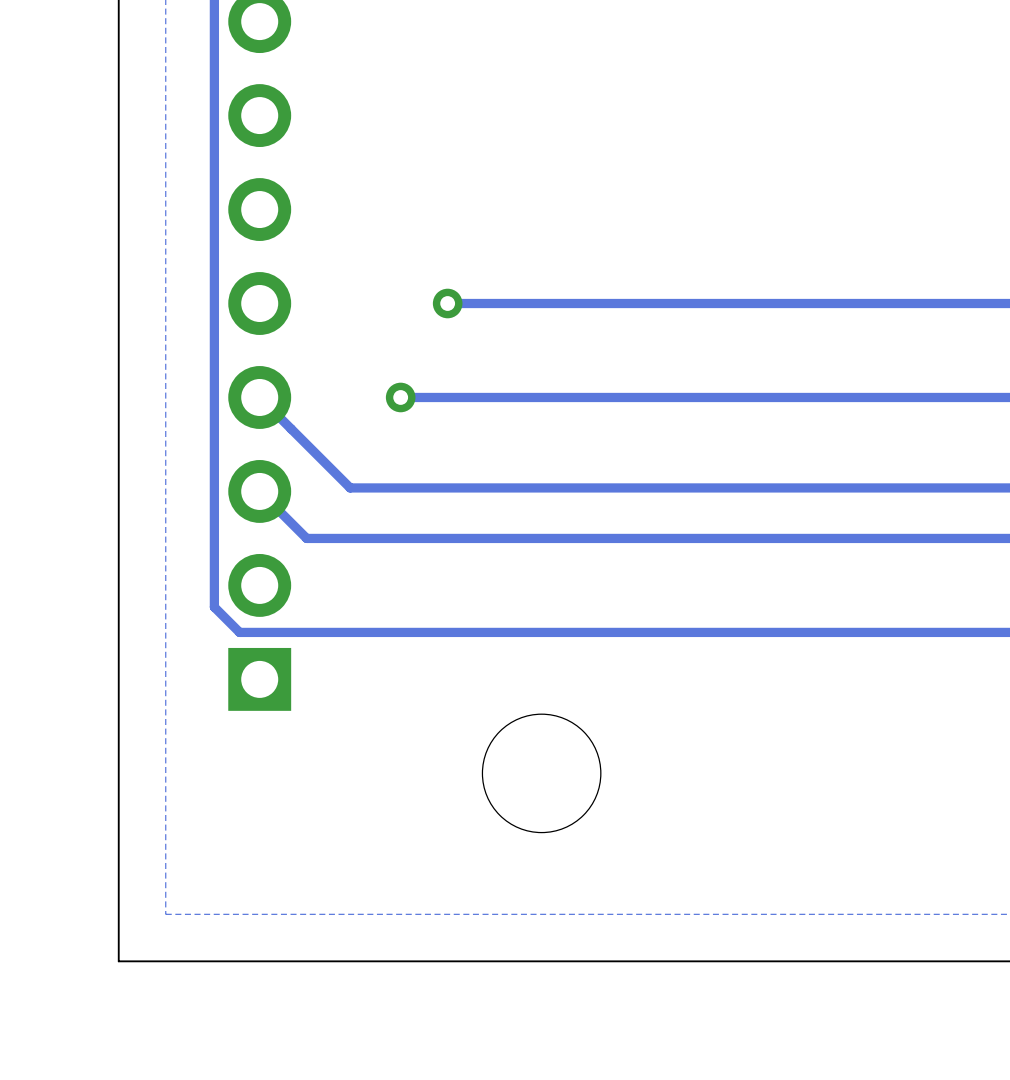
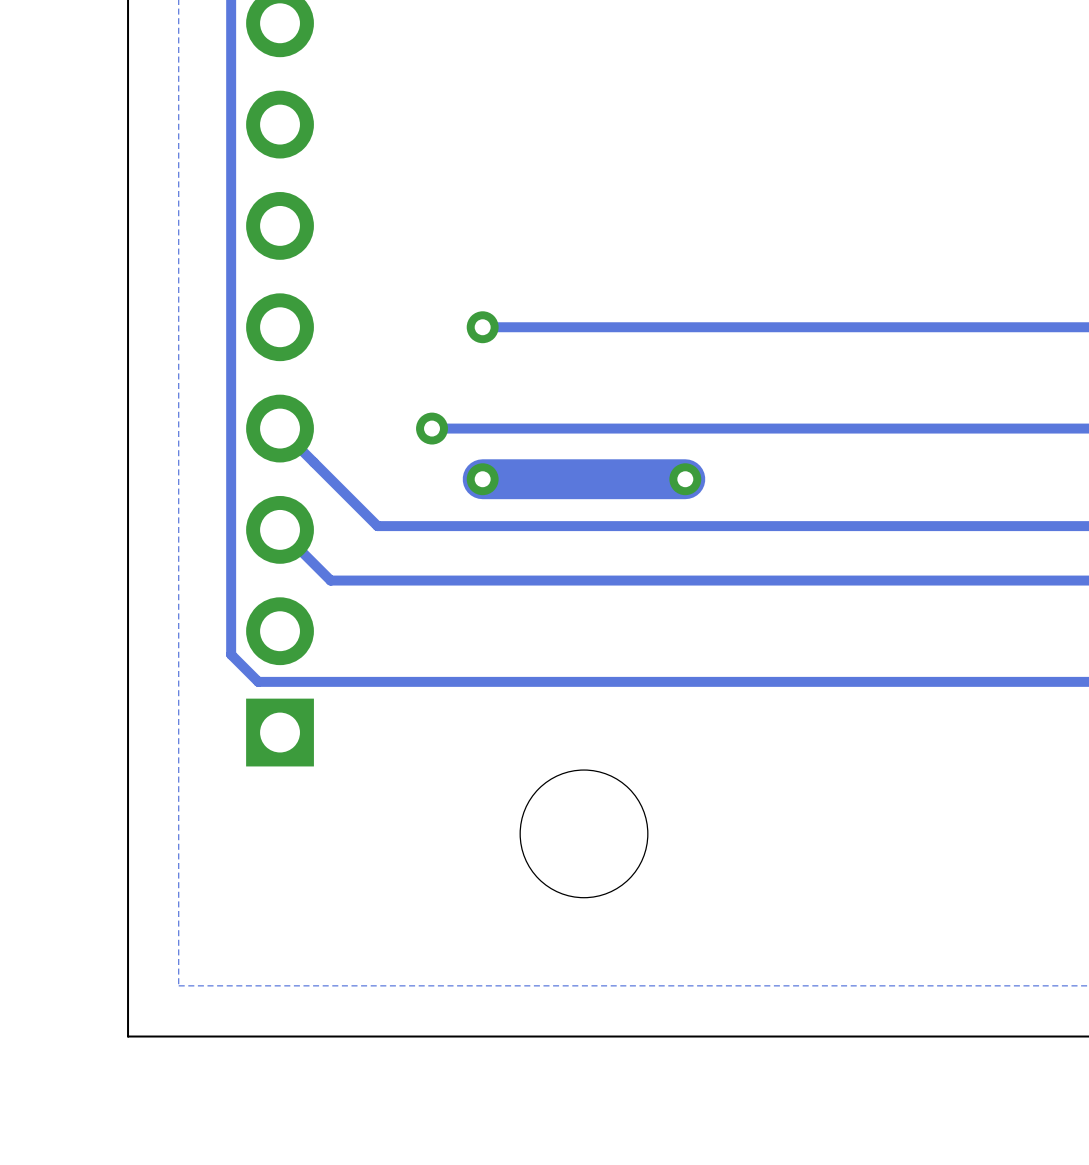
via: none -> (482, 479)
track: none -> (685, 479) (482, 479)
via: none -> (685, 479)

